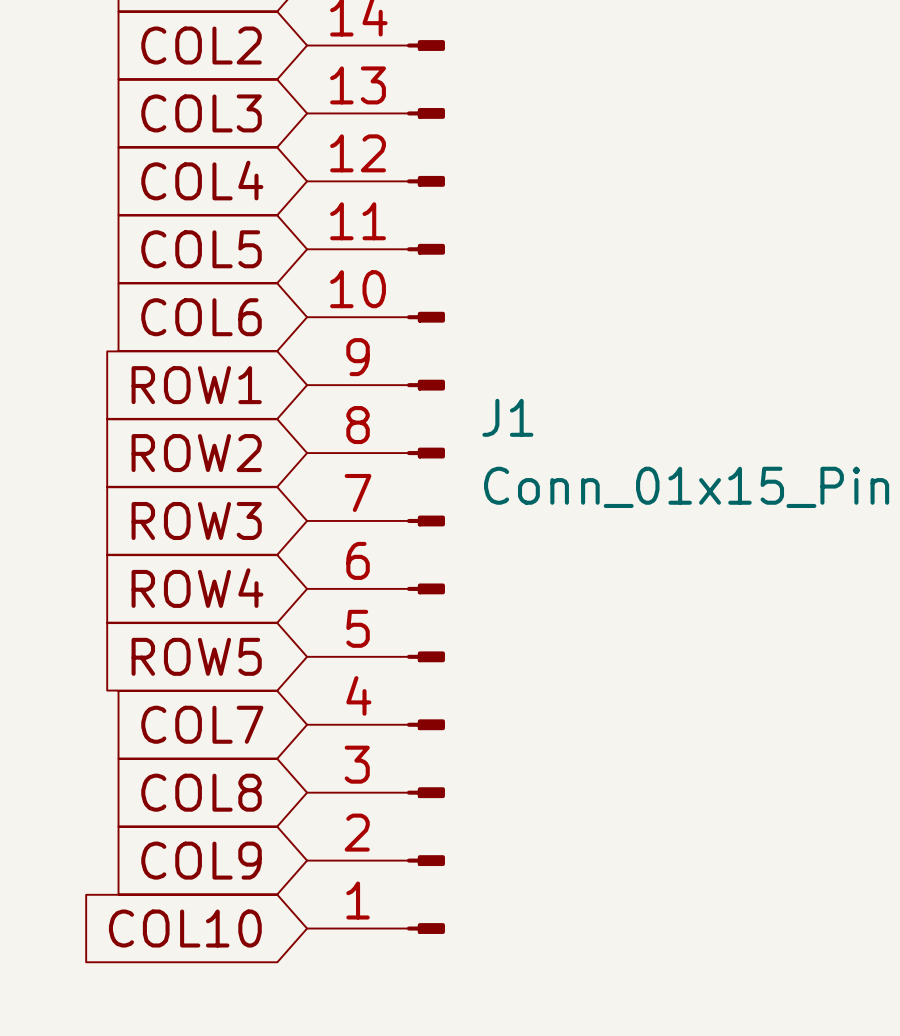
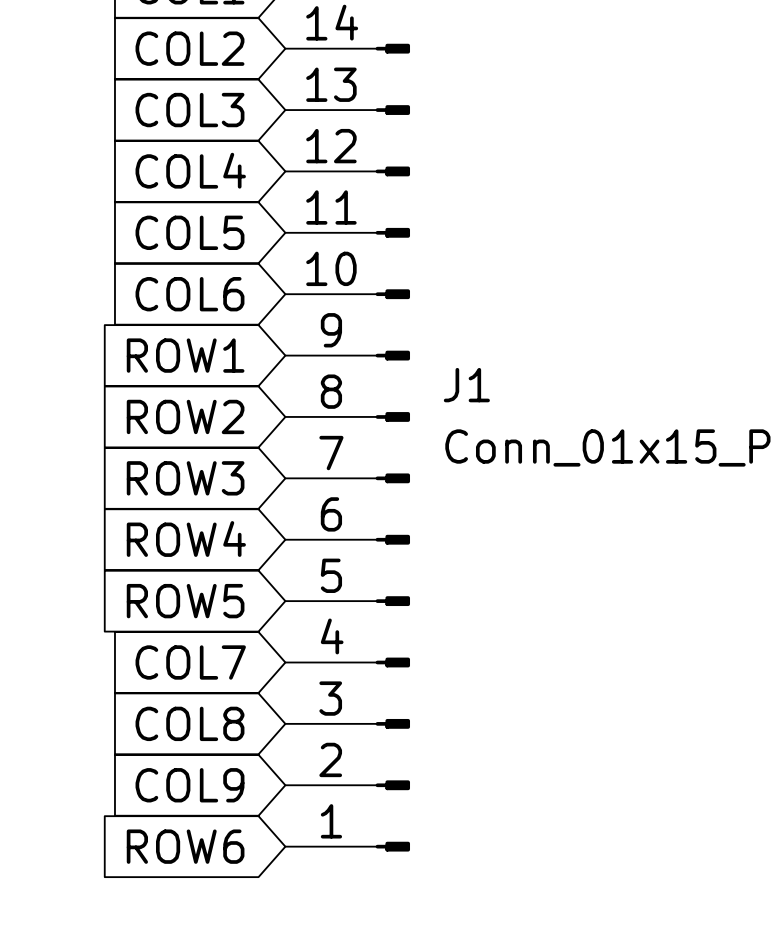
global label: COL10 (185, 928) -> ROW6 (185, 846)

